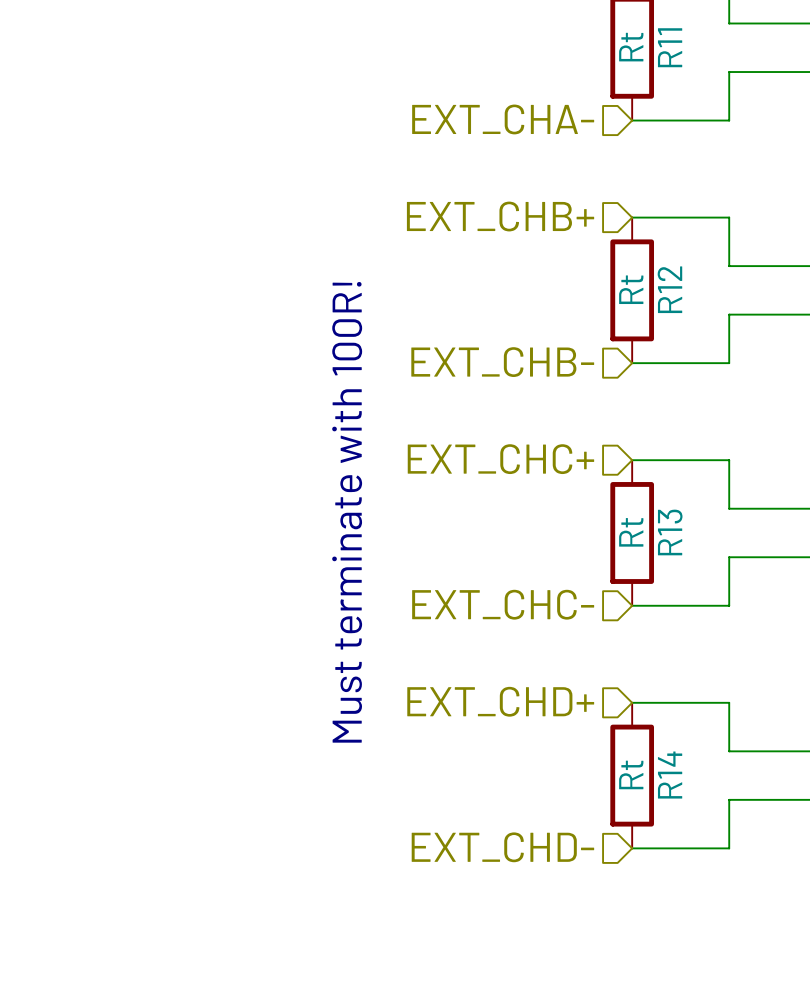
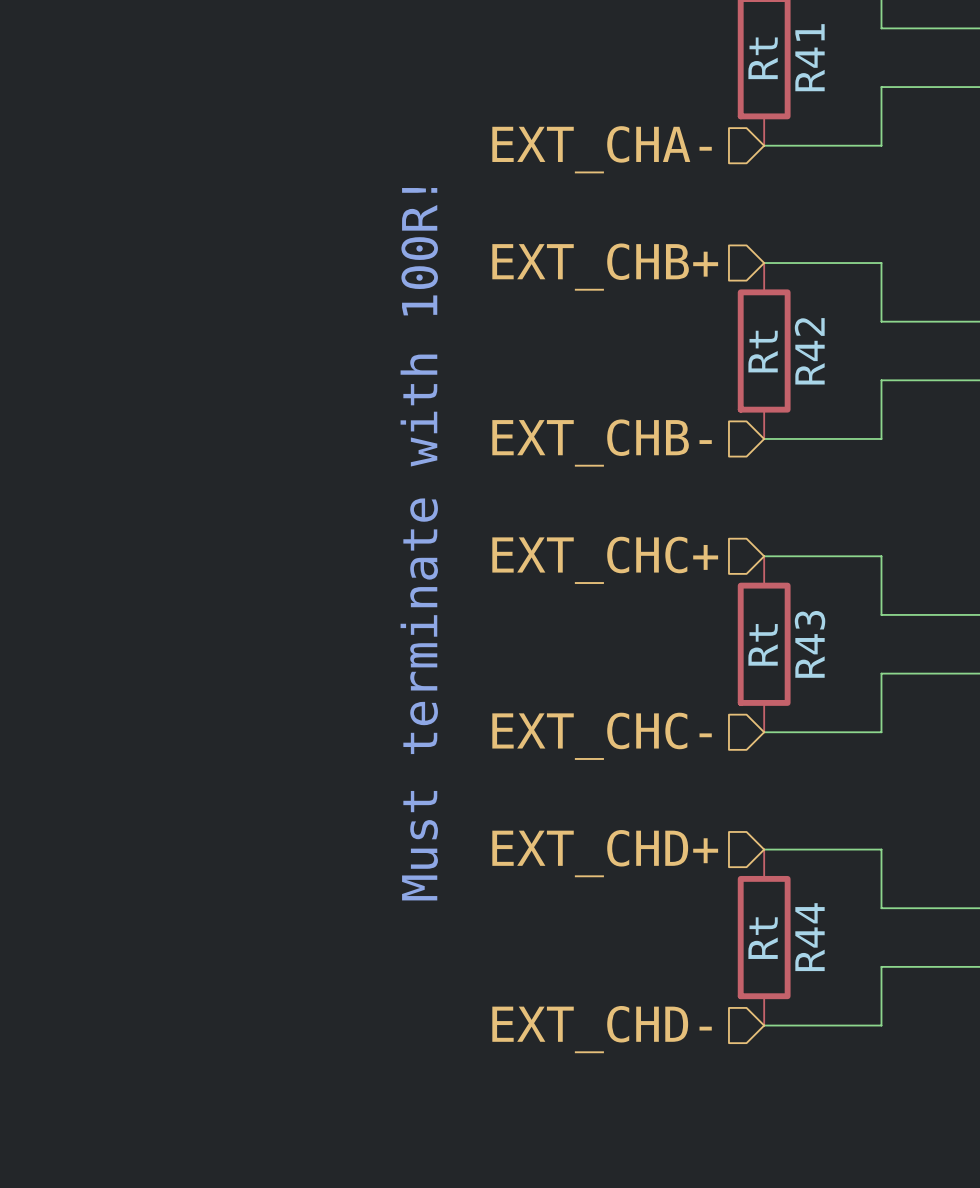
R11 name: R11 (670, 47) -> R41 (810, 57)
R12 name: R12 (669, 289) -> R42 (809, 351)
R13 name: R13 (670, 532) -> R43 (810, 644)
R14 name: R14 (670, 775) -> R44 (810, 937)

